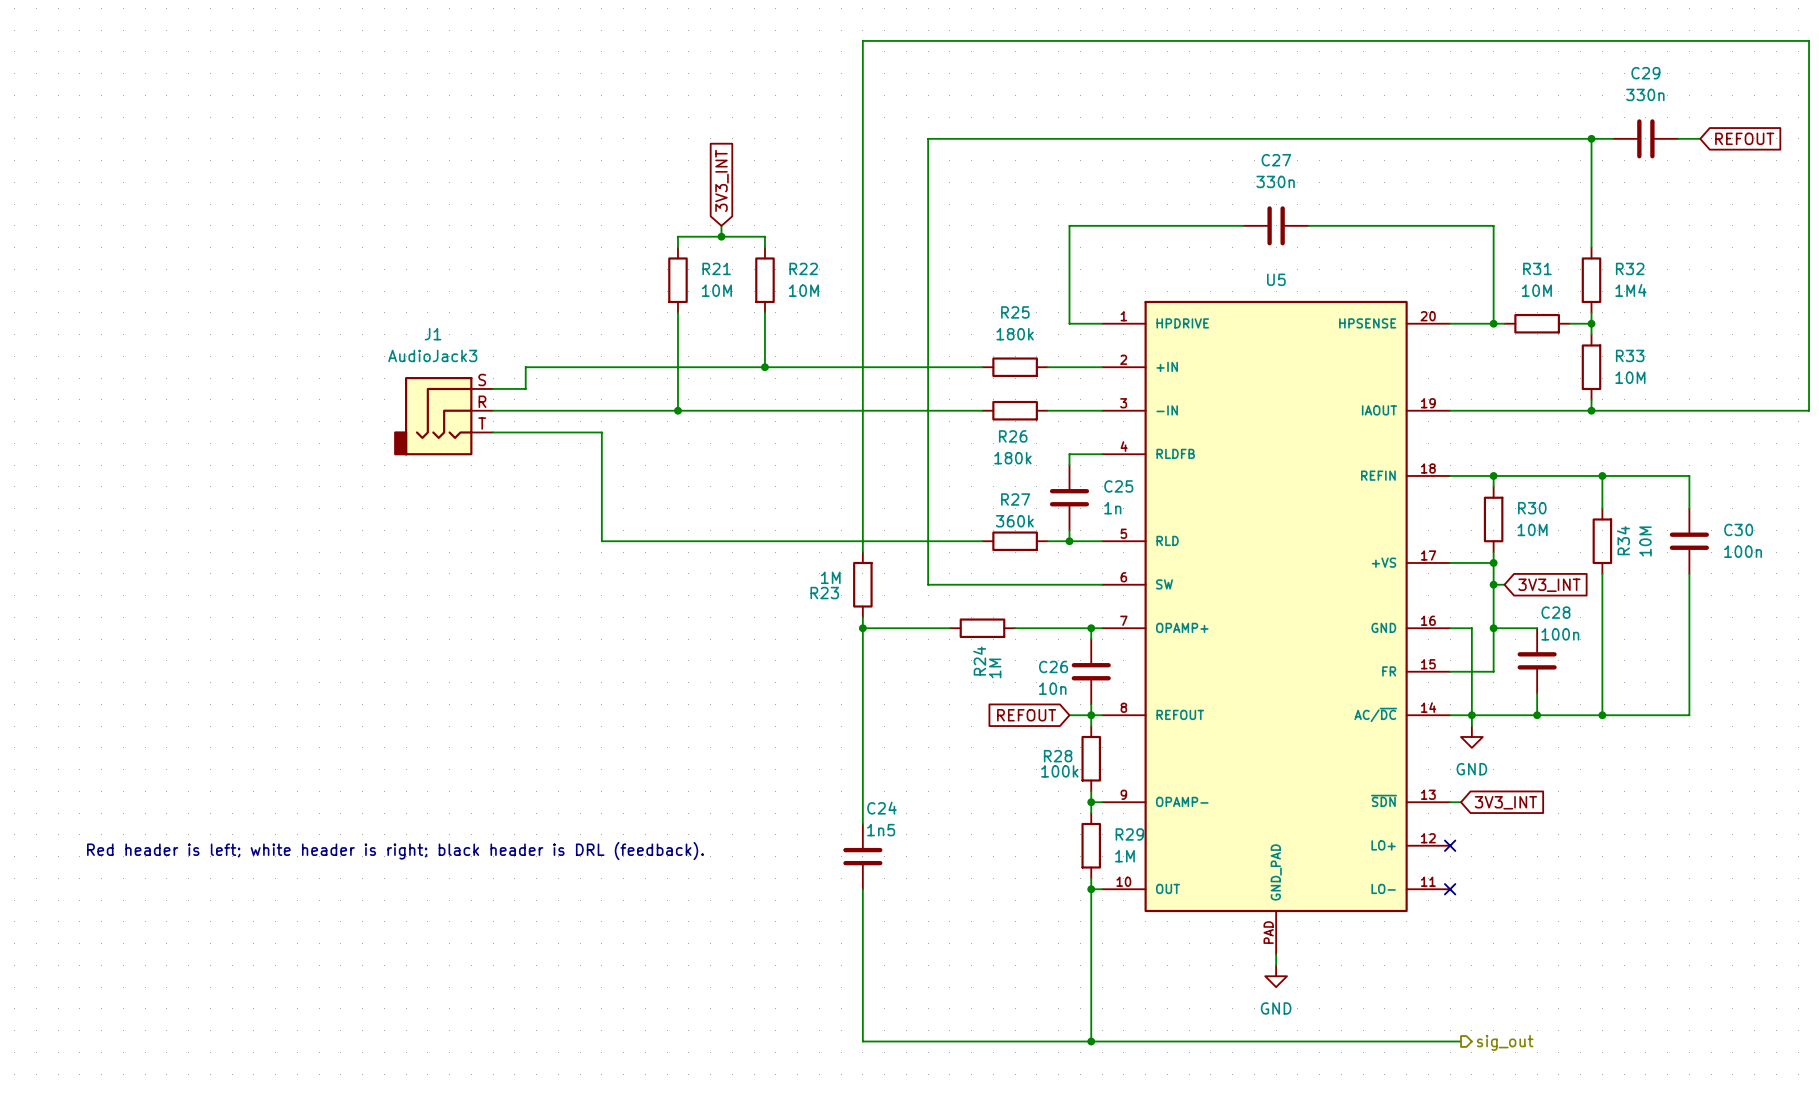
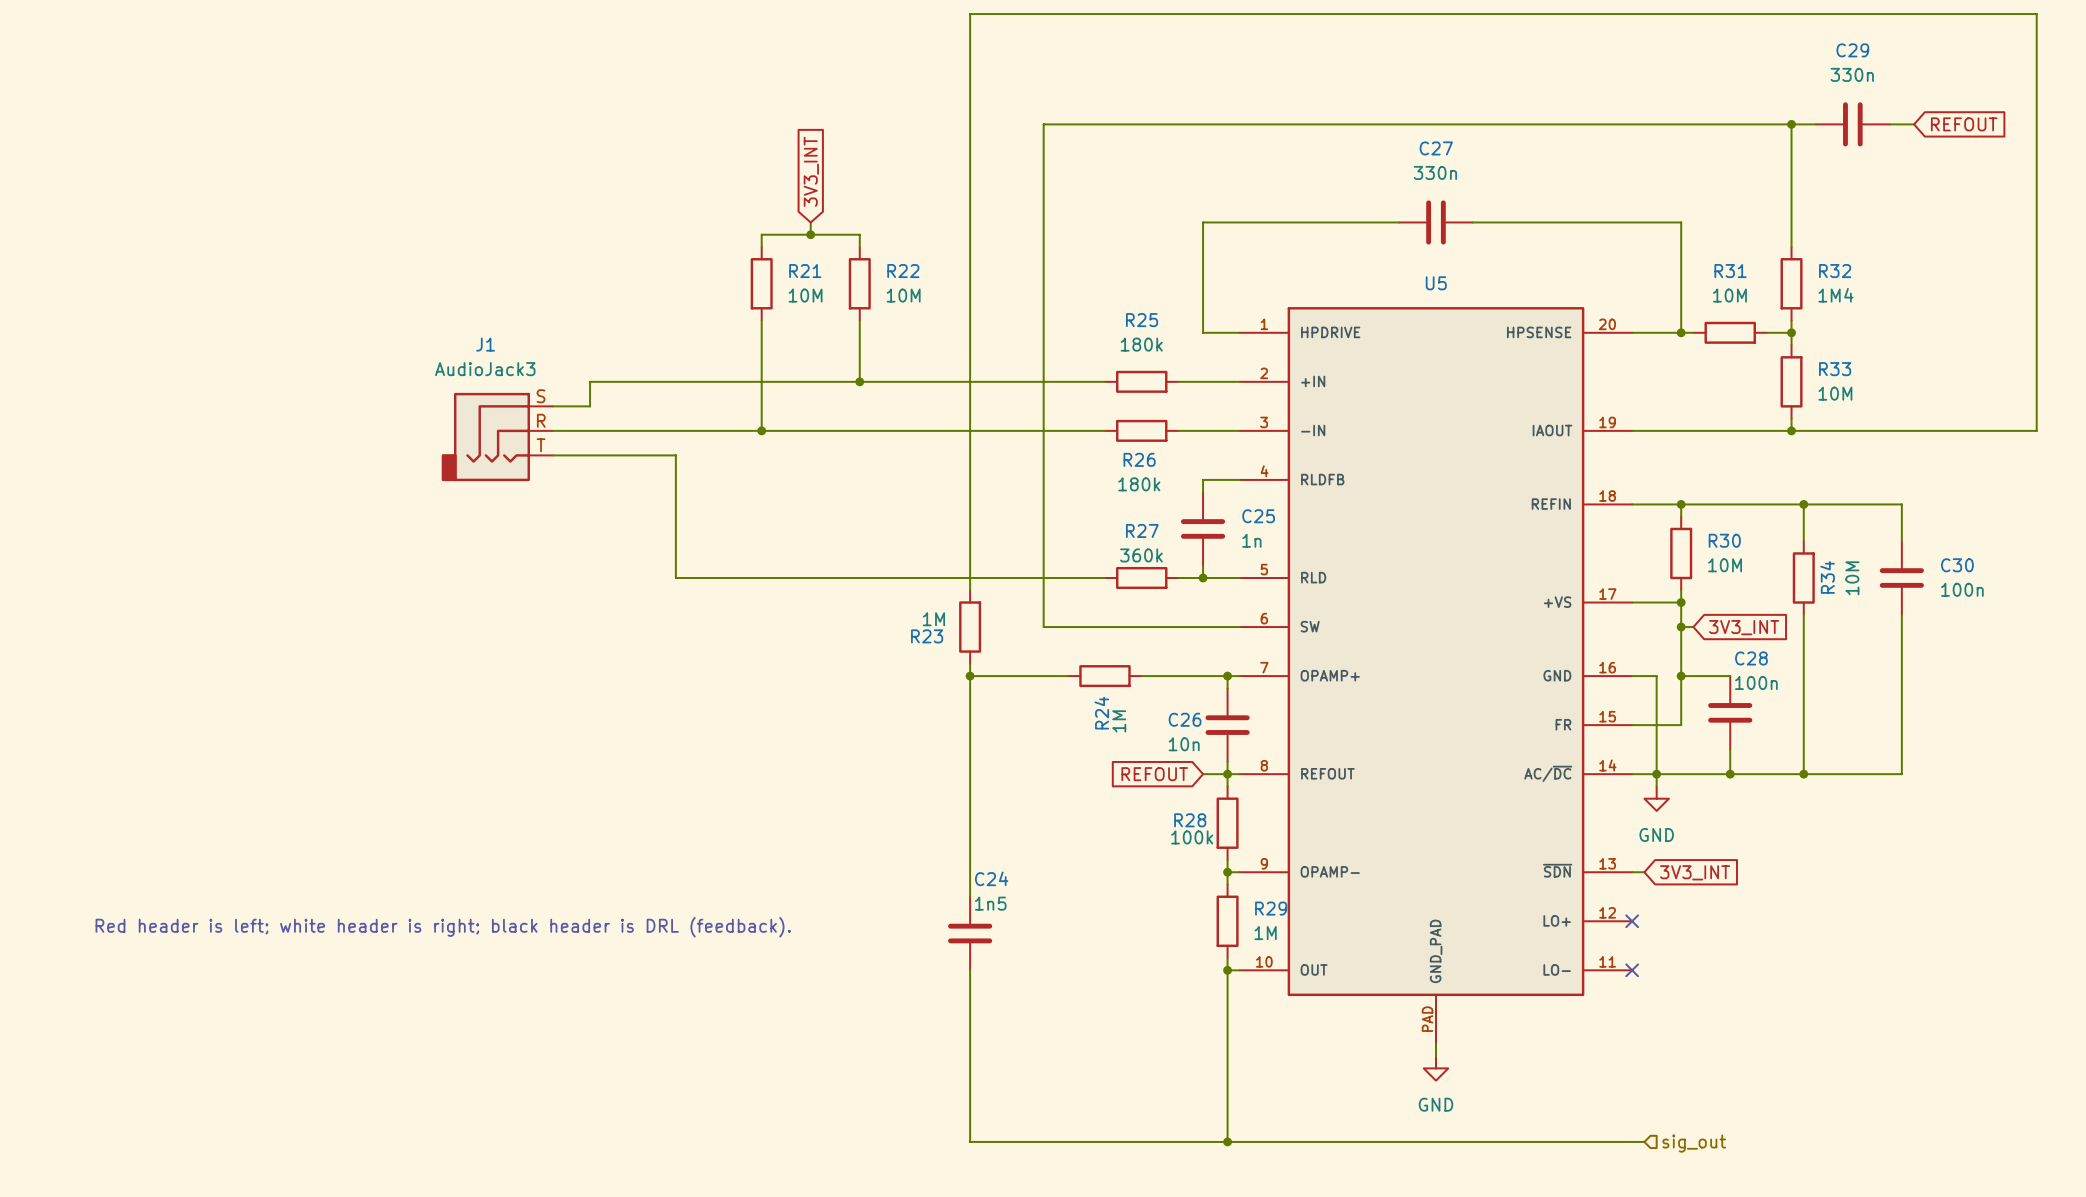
hierarchical label shape: output (1505, 1042) -> input (1694, 1143)

